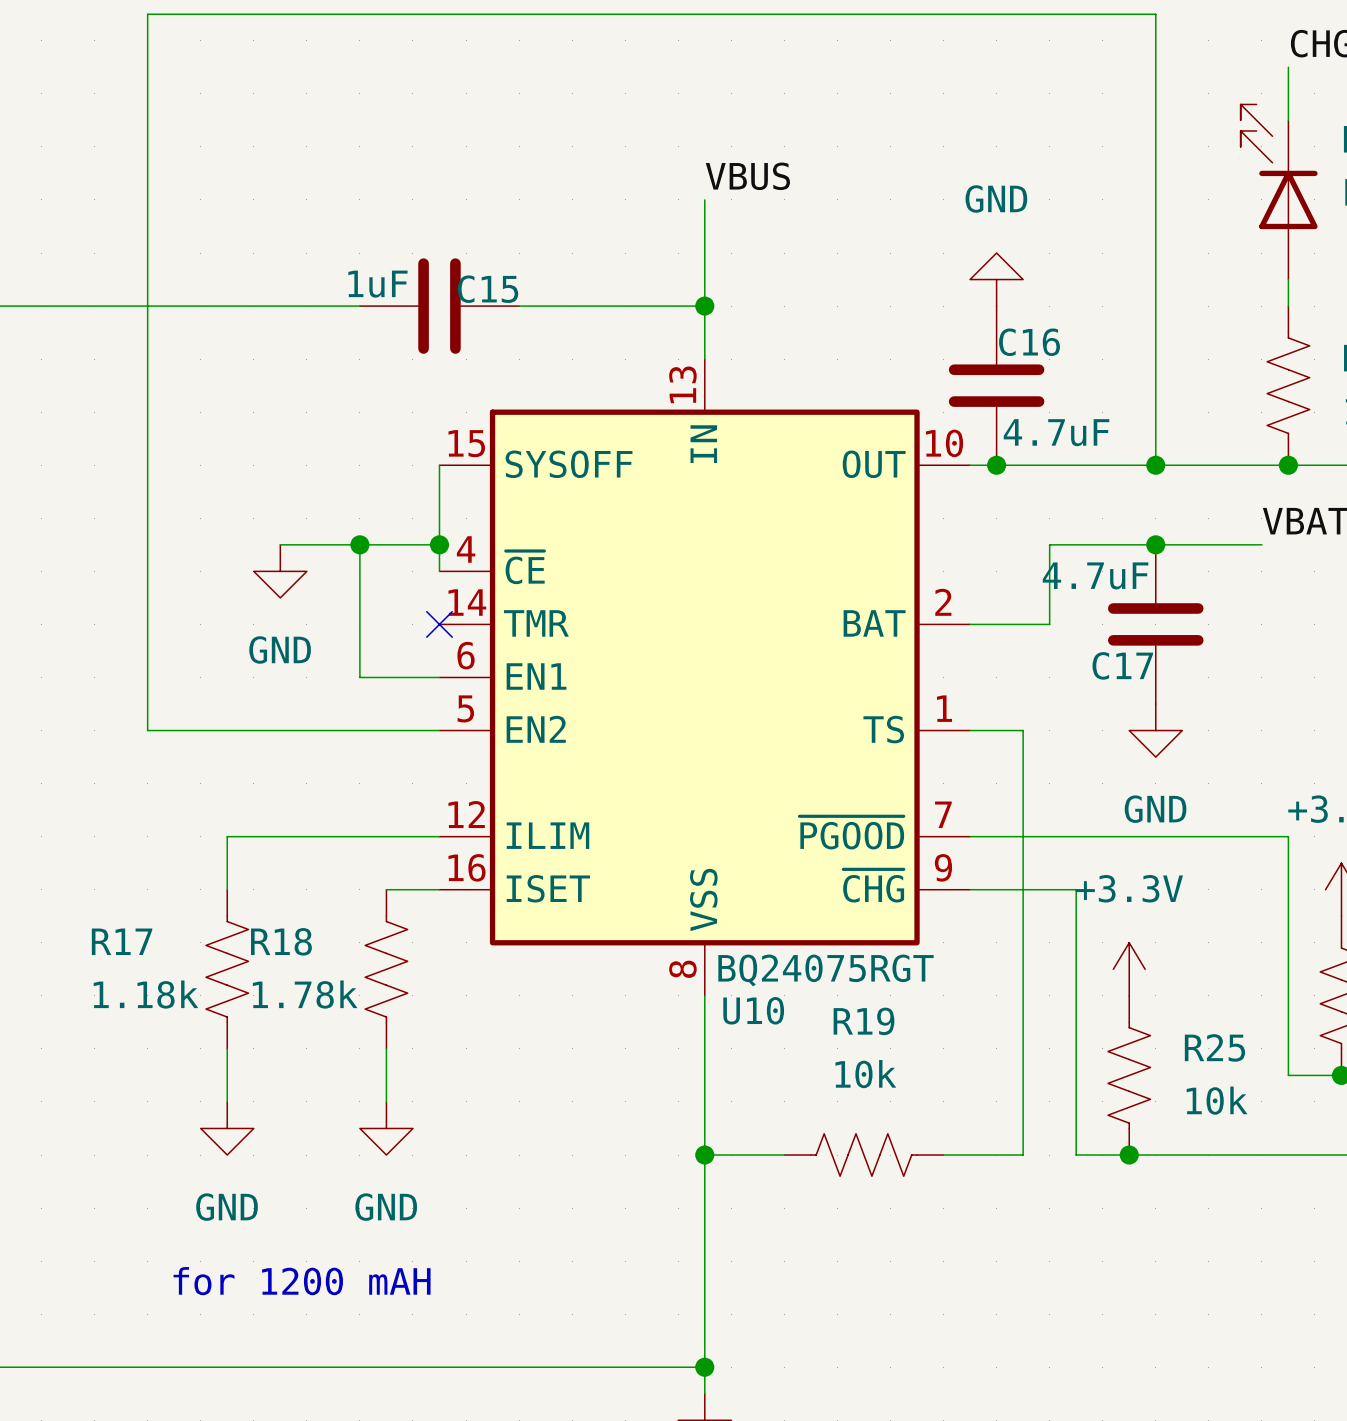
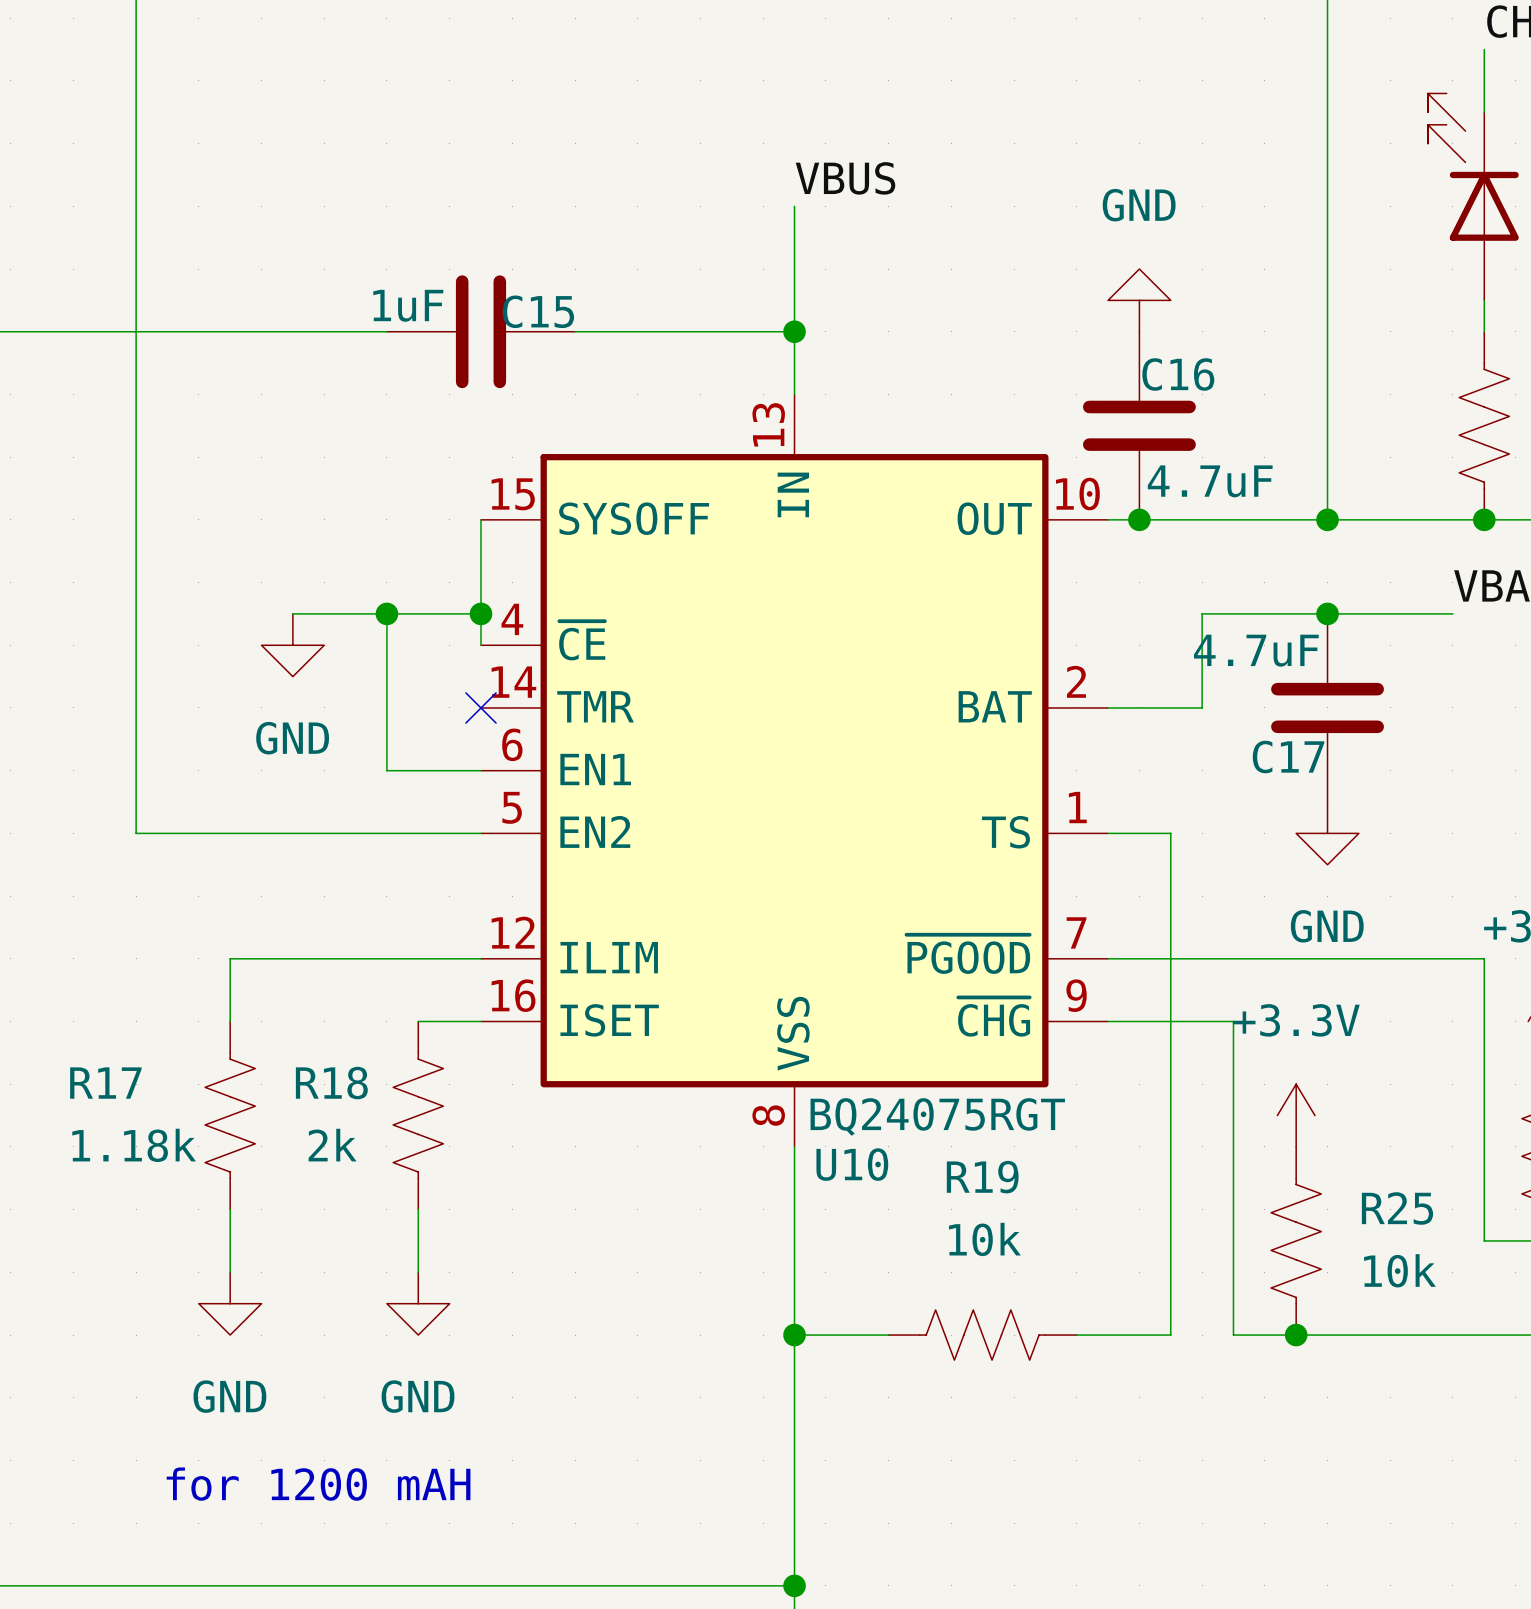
R18 name position: R18 (281, 941) -> R18 (331, 1083)
R18 value: 1.78k (305, 994) -> 2k (332, 1145)

